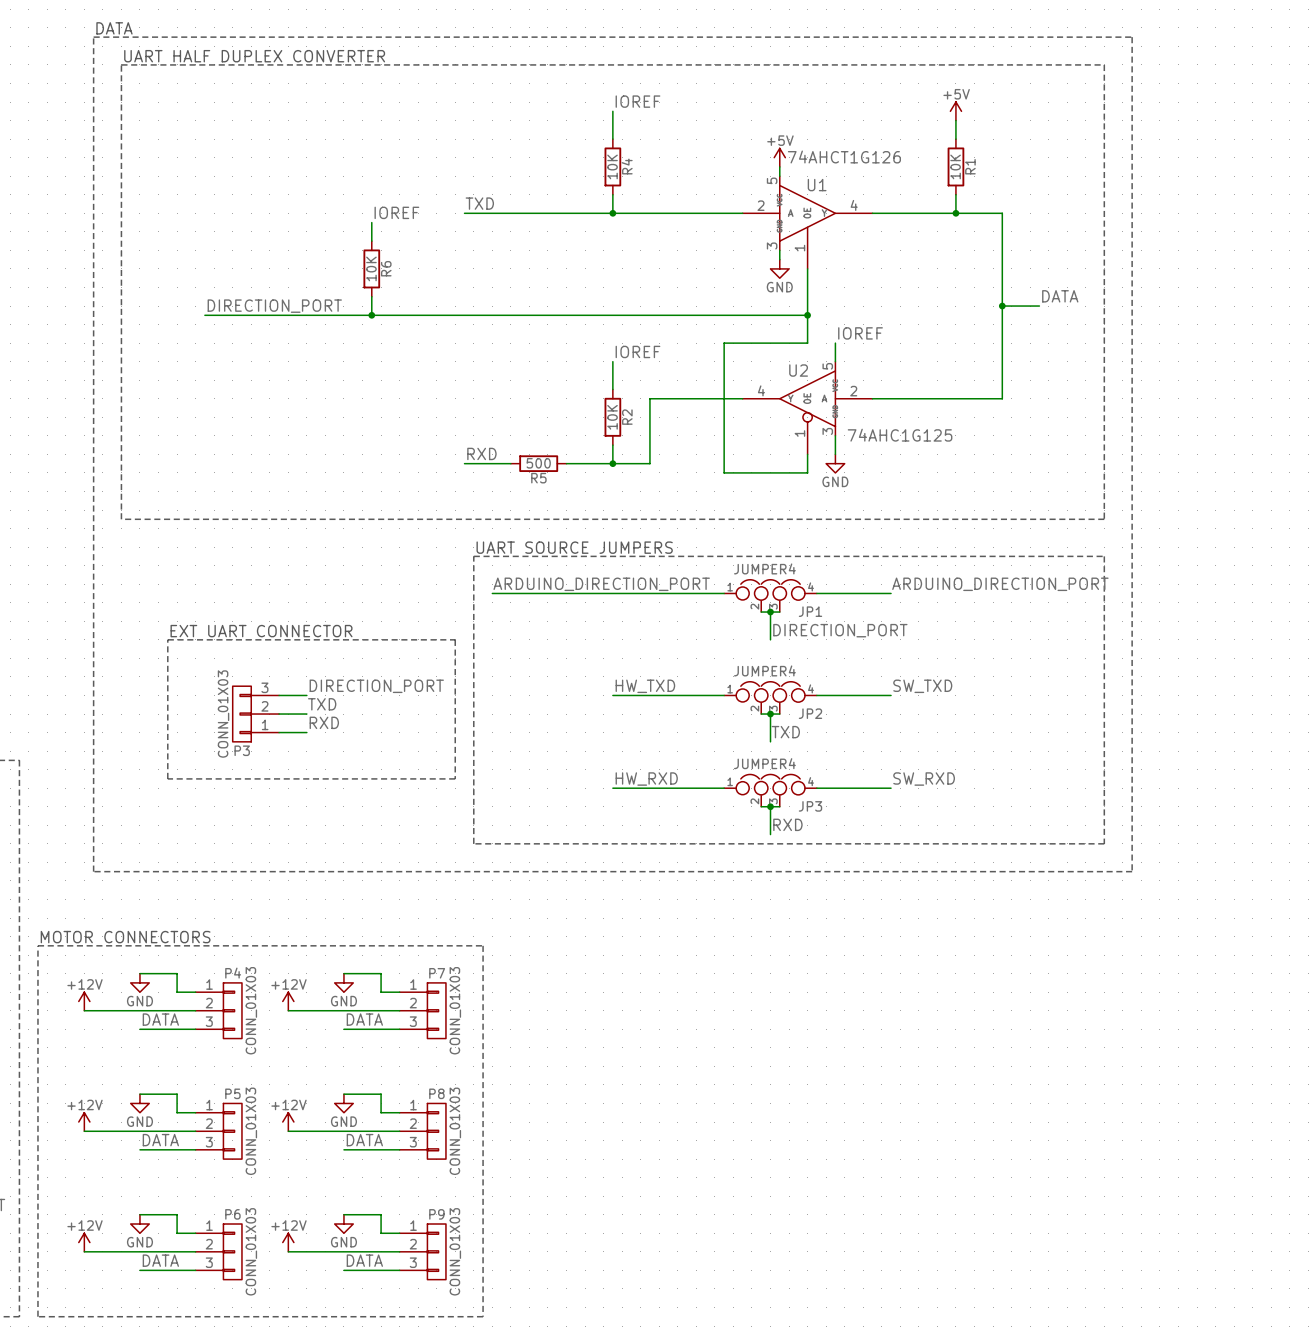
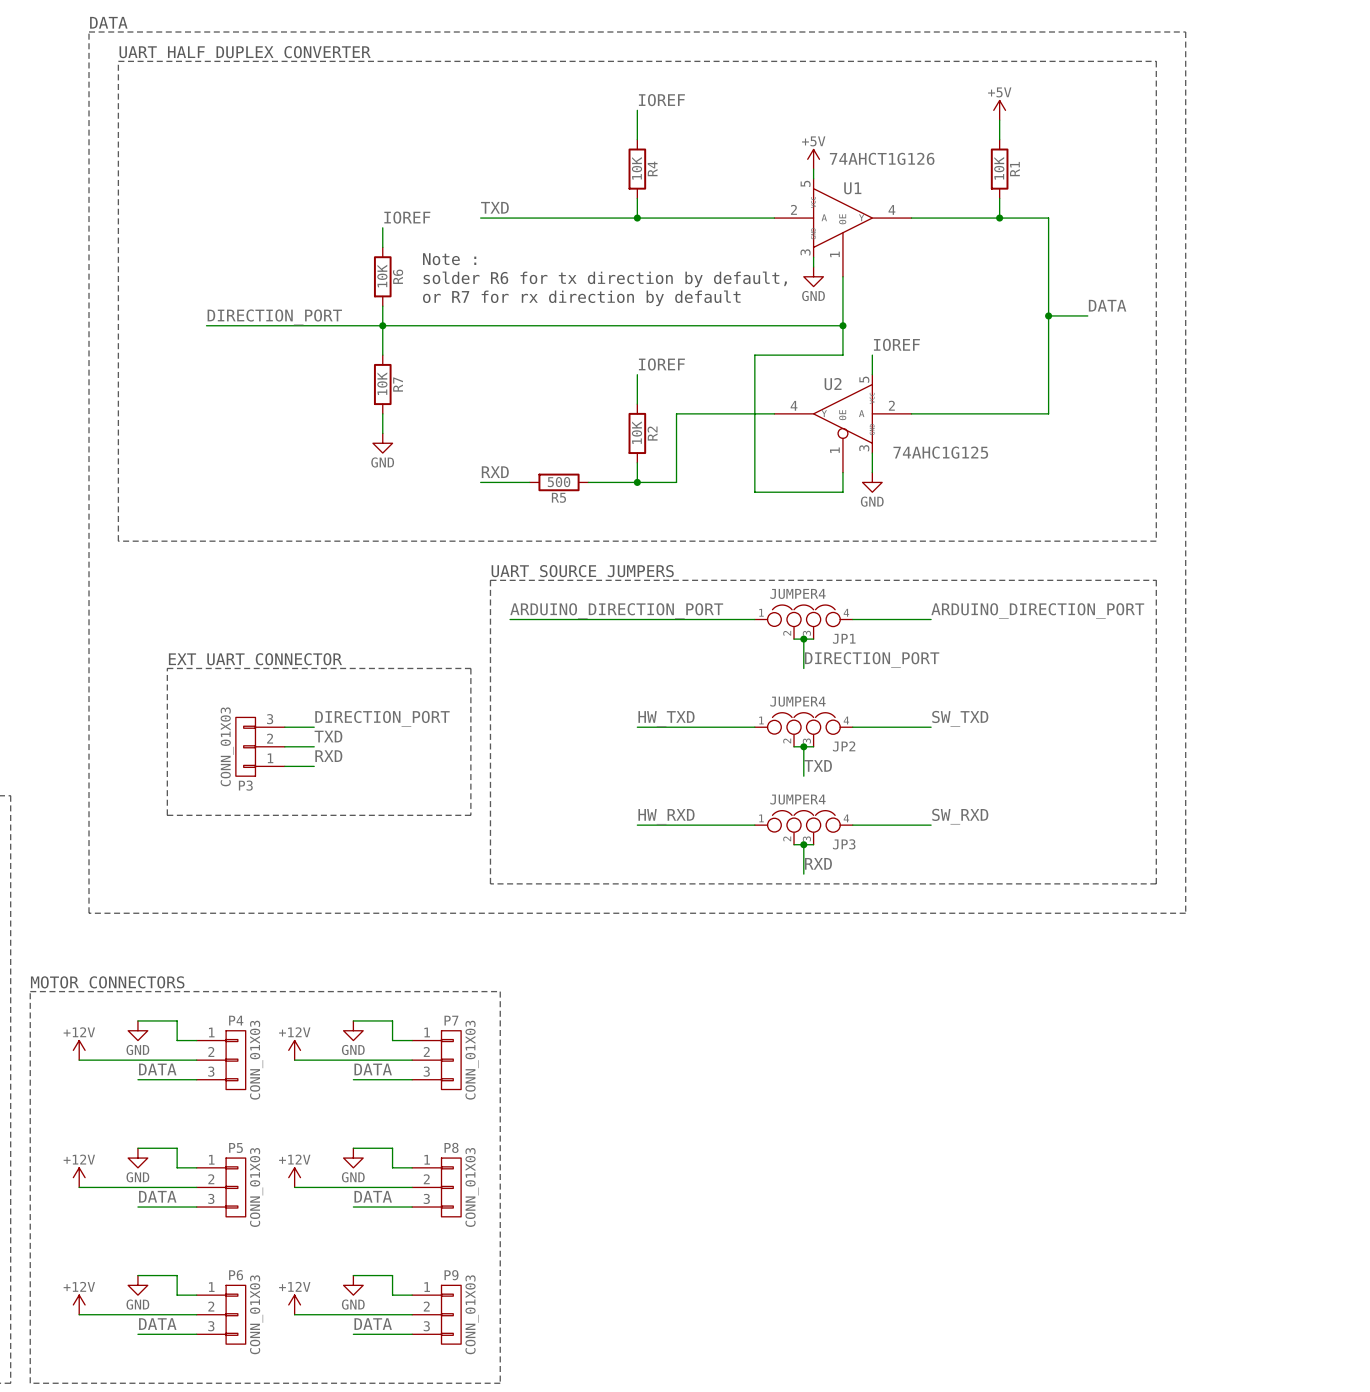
text: none -> Note : (449, 259)
text: none -> solder R6 for tx direction by default, (605, 279)
text: none -> or R7 for rx direction by default (581, 298)
wire: none -> (382, 325) (382, 355)
R7: none -> 10K (382, 384)
wire: none -> (382, 413) (382, 433)
power symbol: none -> GND (382, 443)

